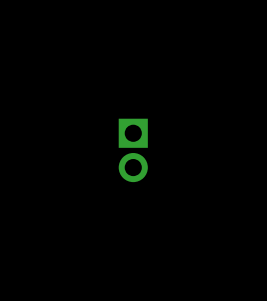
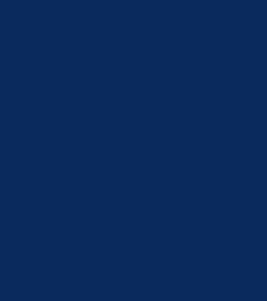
part: (133, 150) -> none

